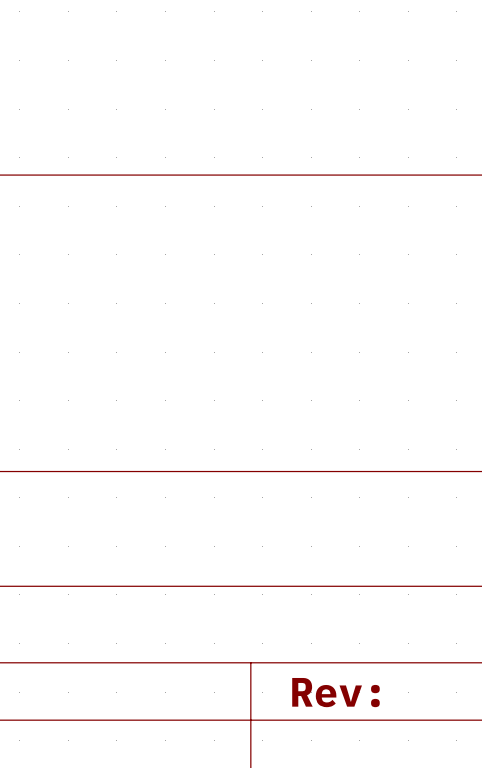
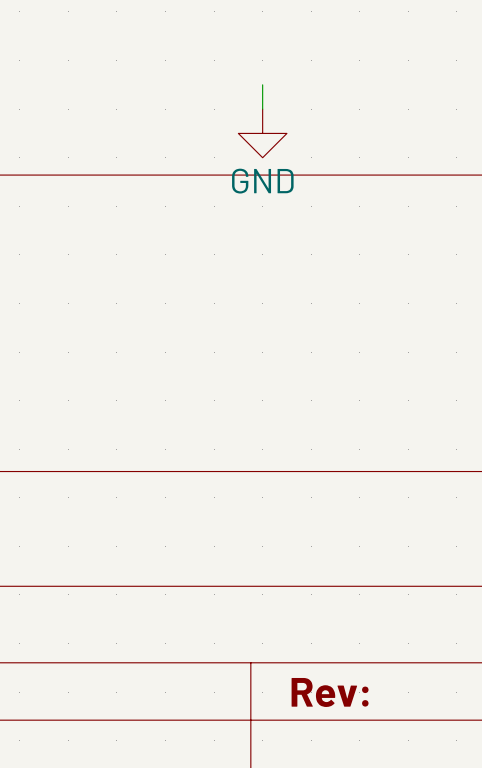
wire: none -> (262, 84) (262, 109)
power symbol: none -> GND (262, 133)

